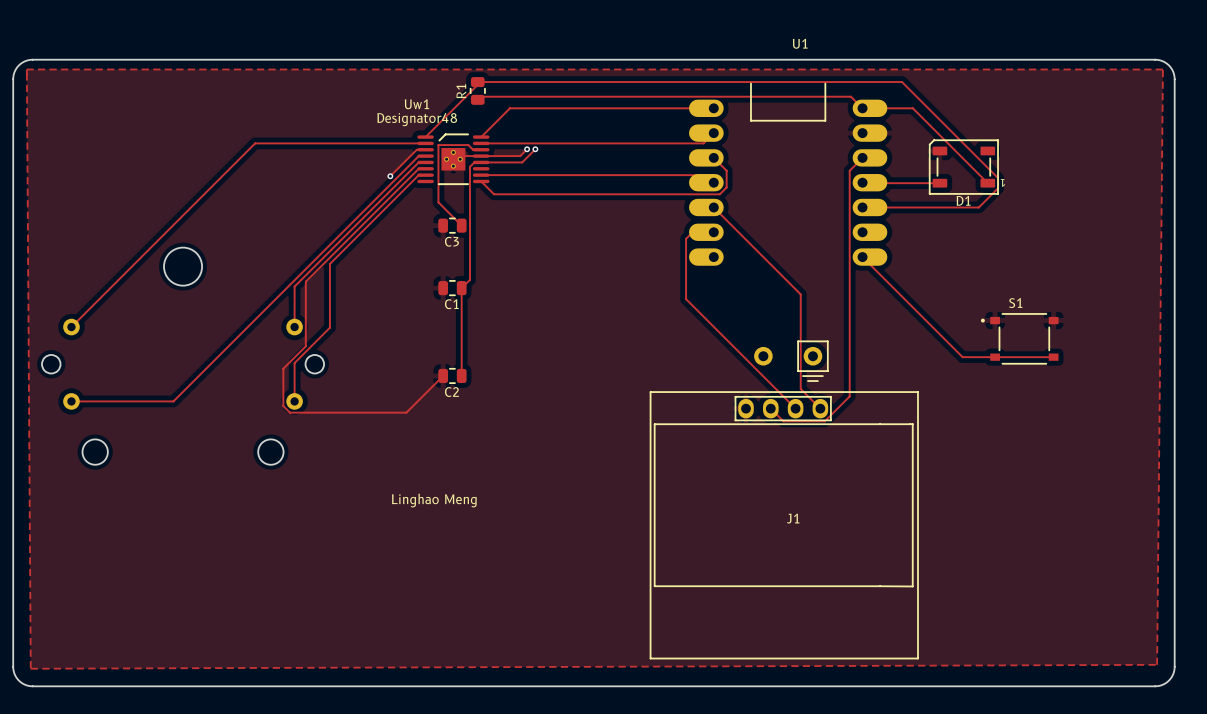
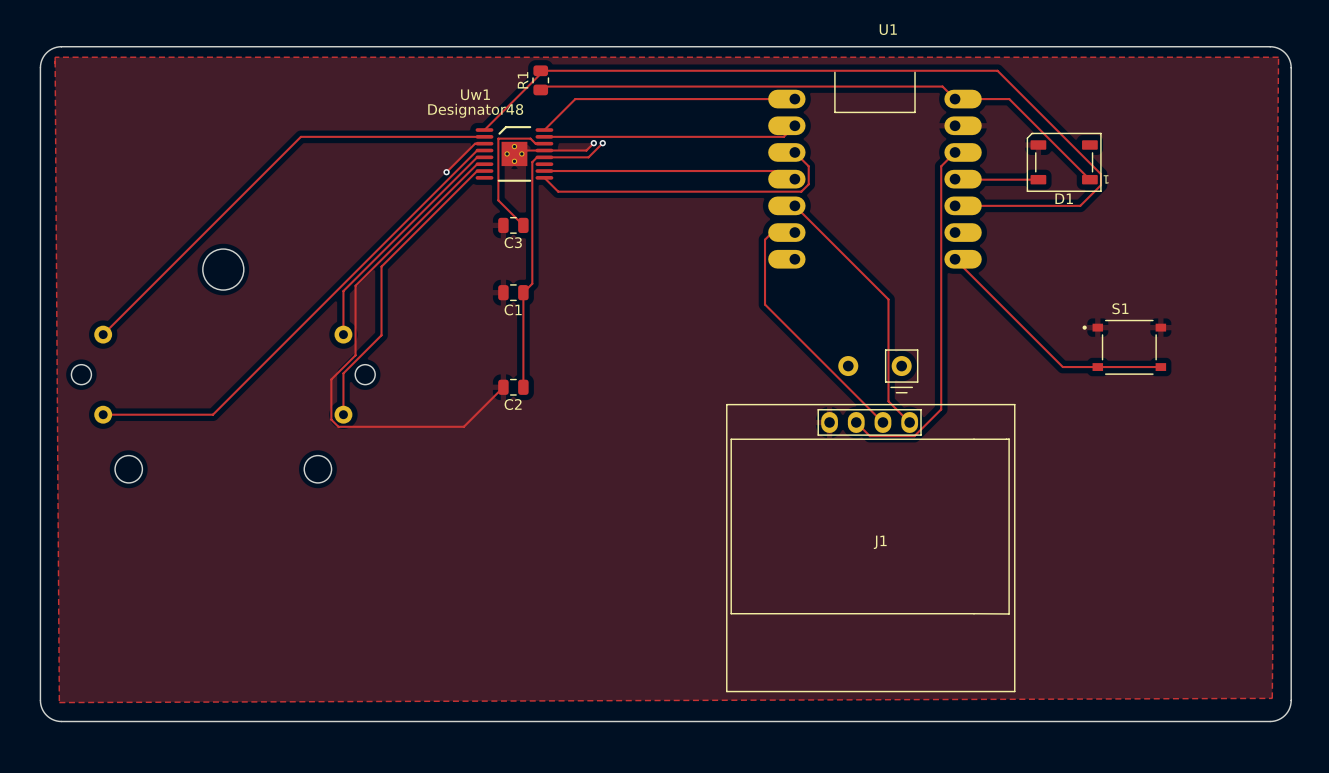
text: Linghao Meng (434, 500) -> none

